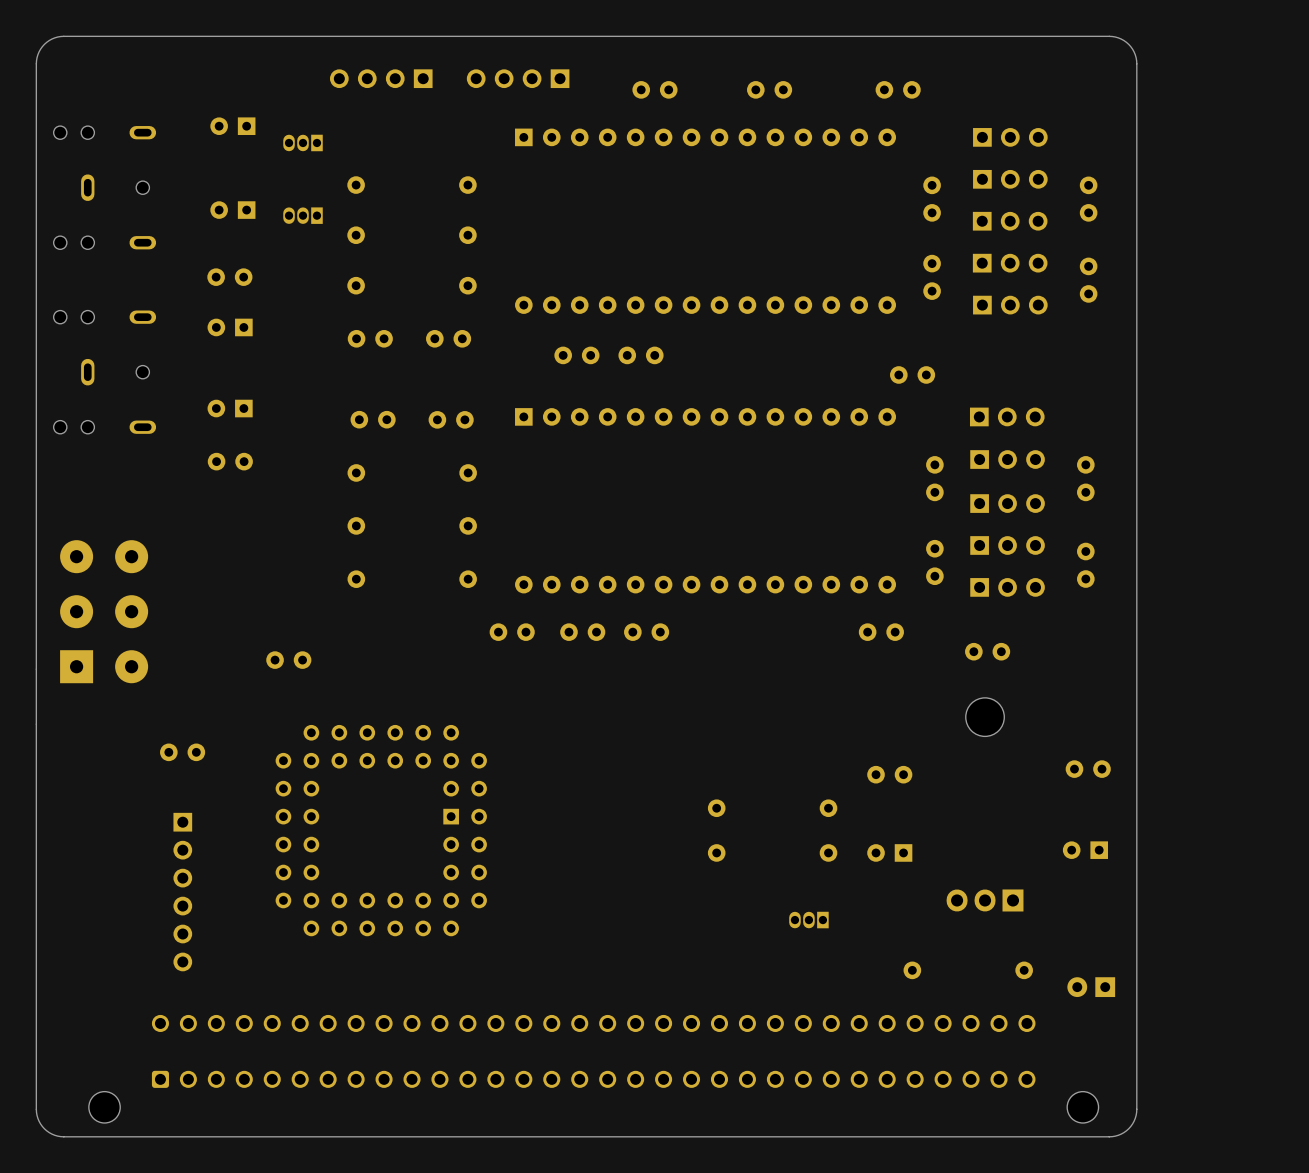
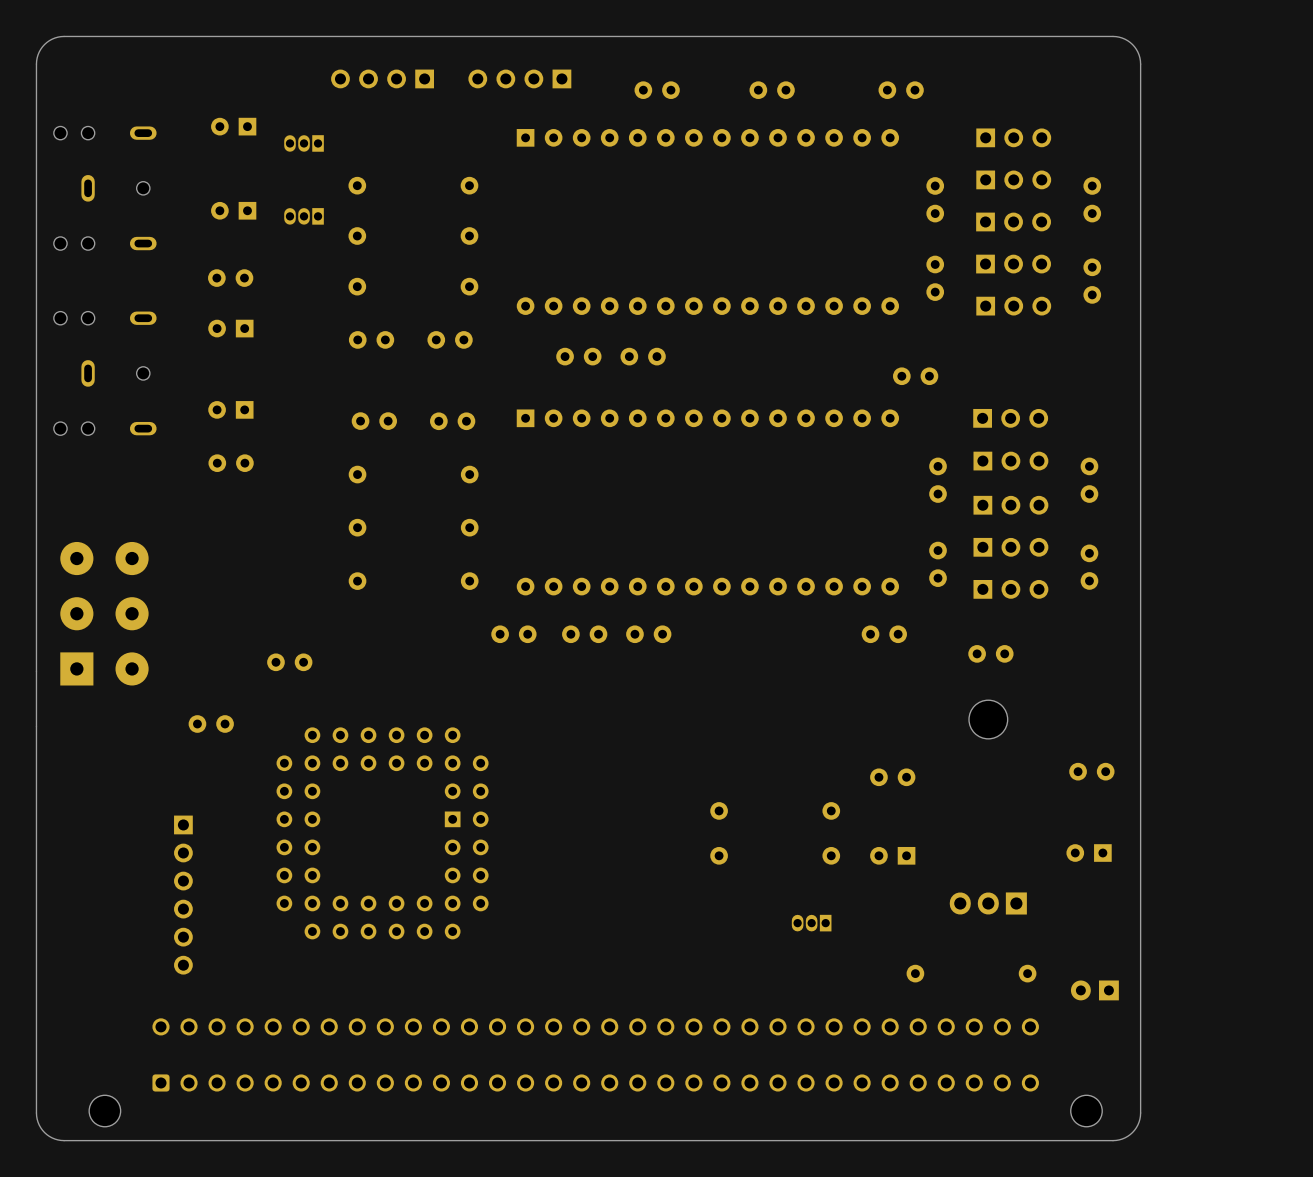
part position: (182, 752) -> (211, 723)

